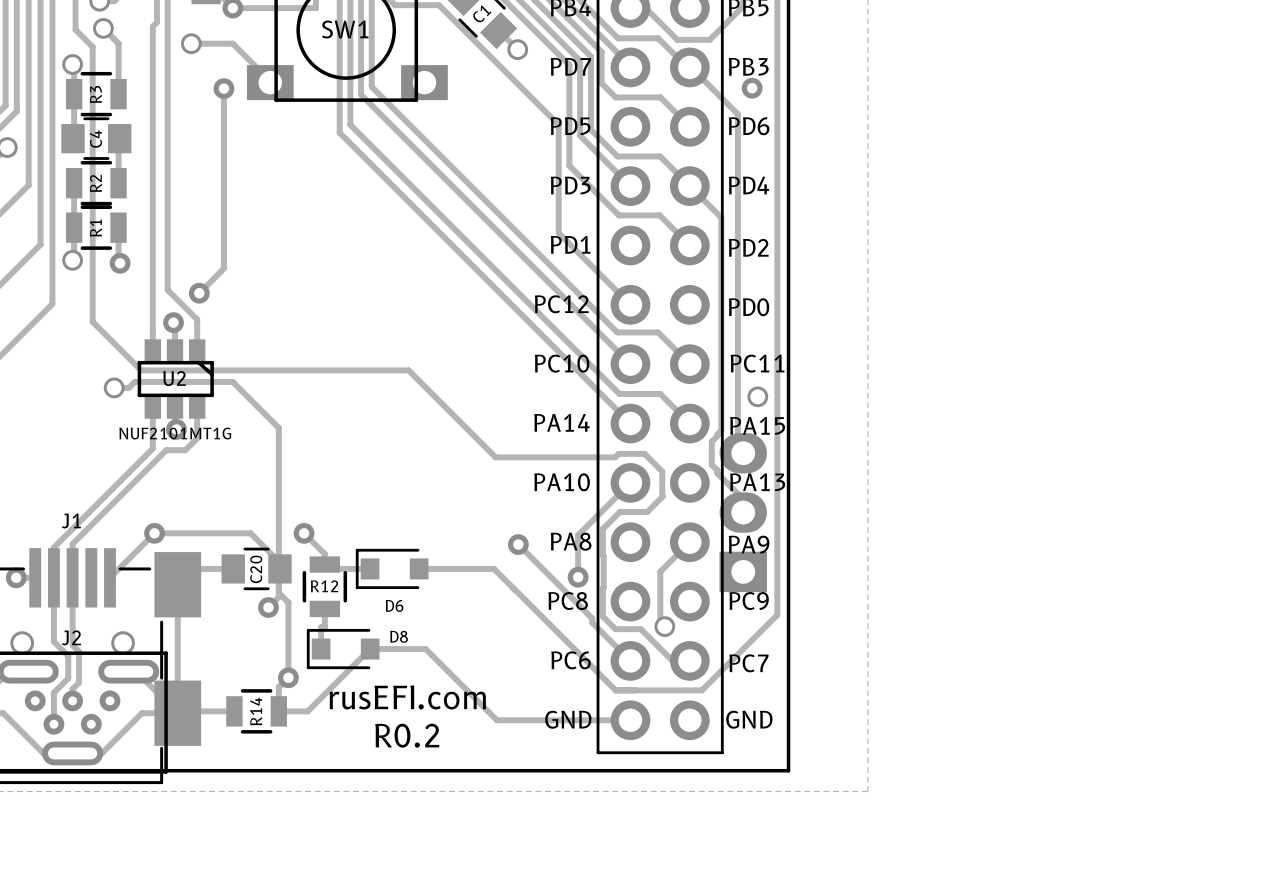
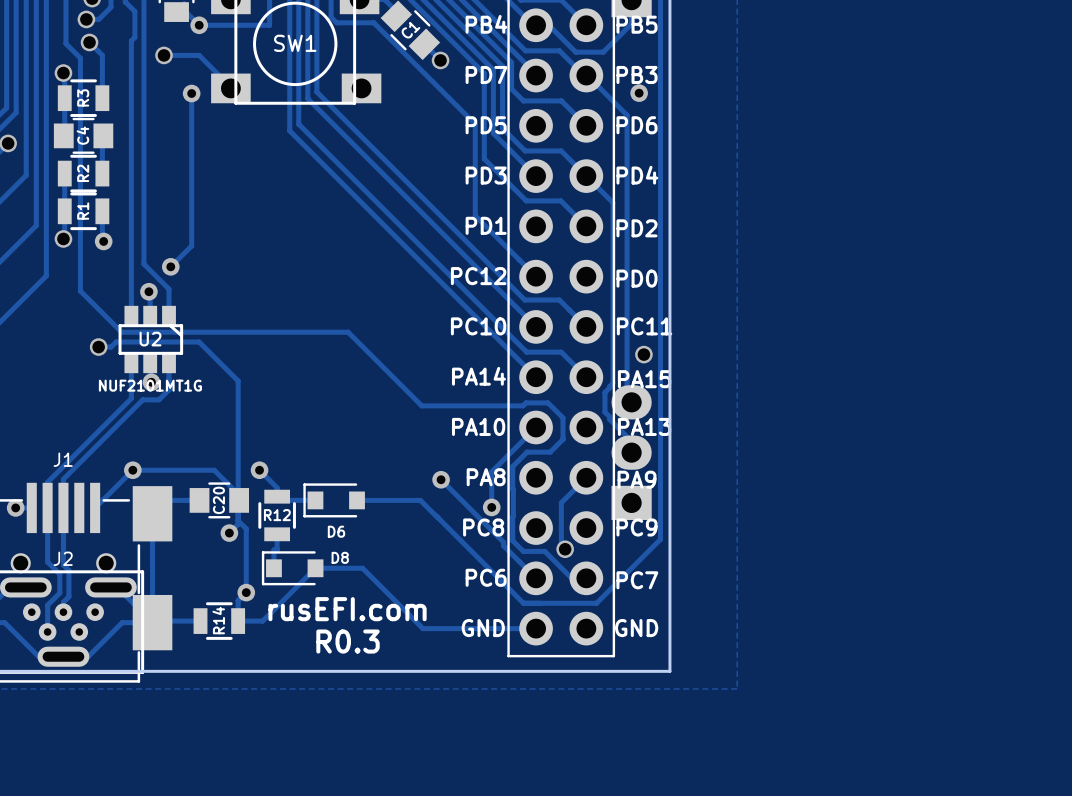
text: R0.2 (407, 735) -> R0.3 (348, 641)

